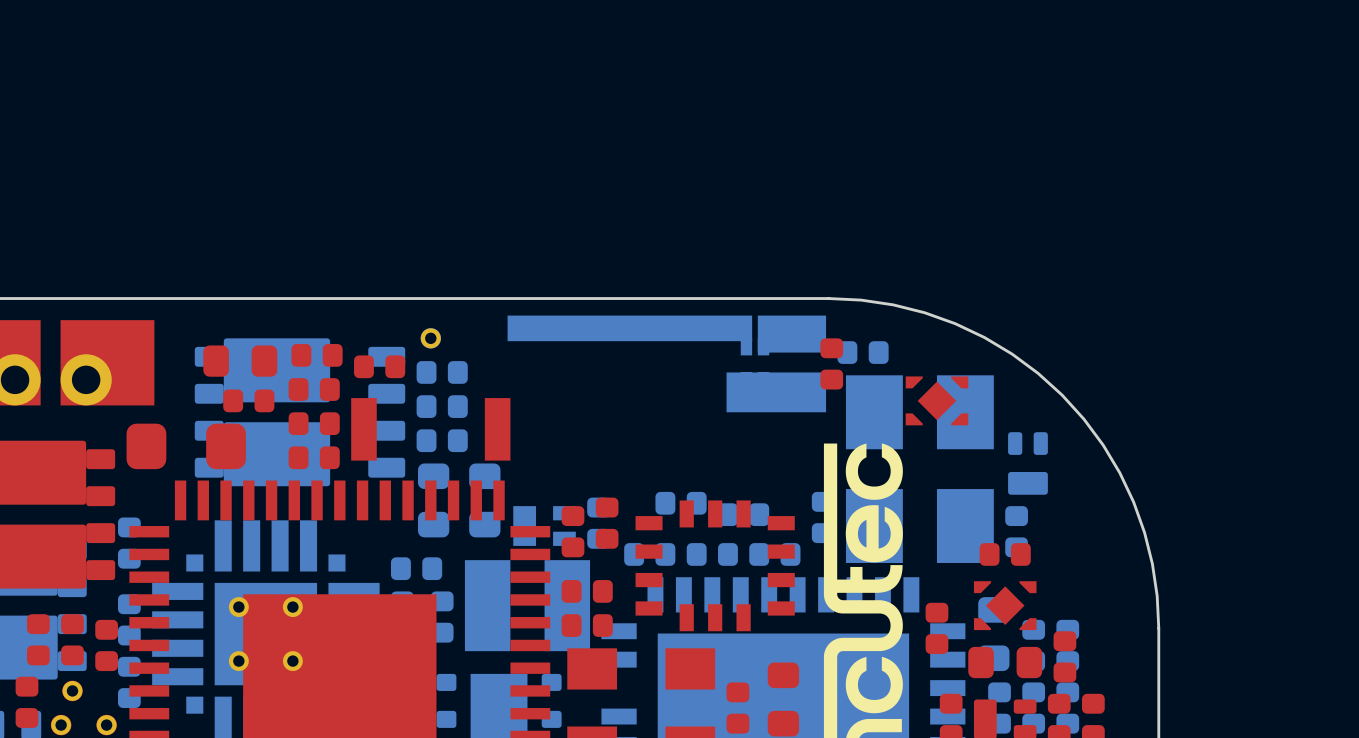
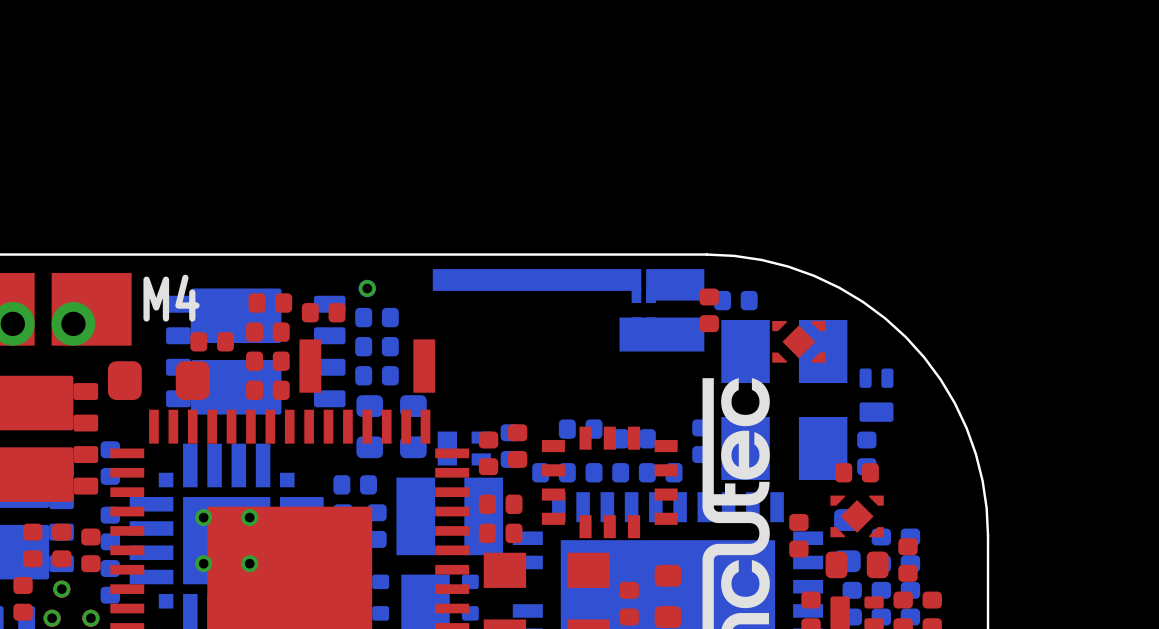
text: none -> M4 (171, 298)
part: (240, 361) -> none

